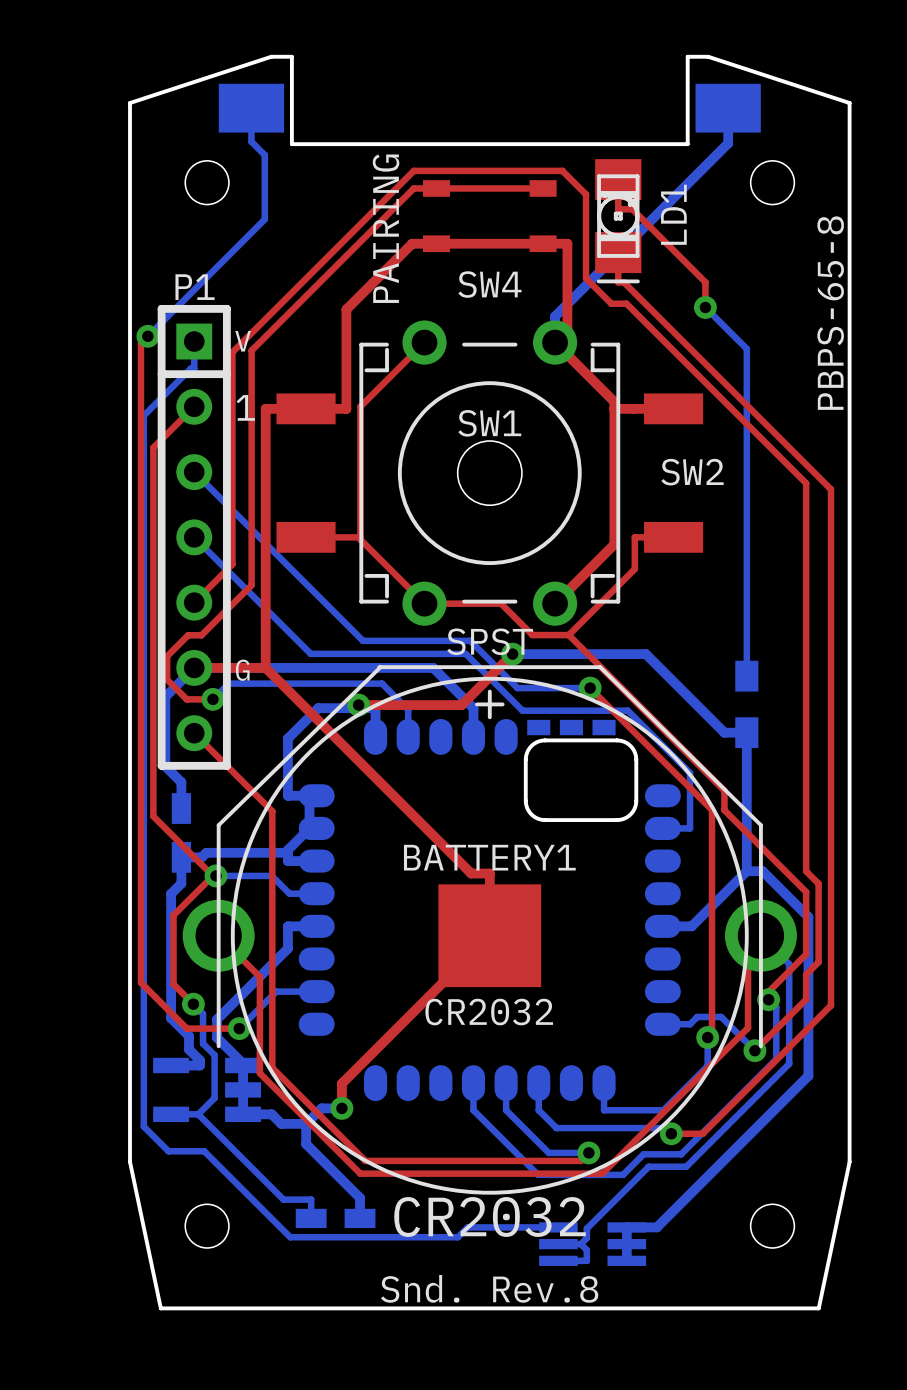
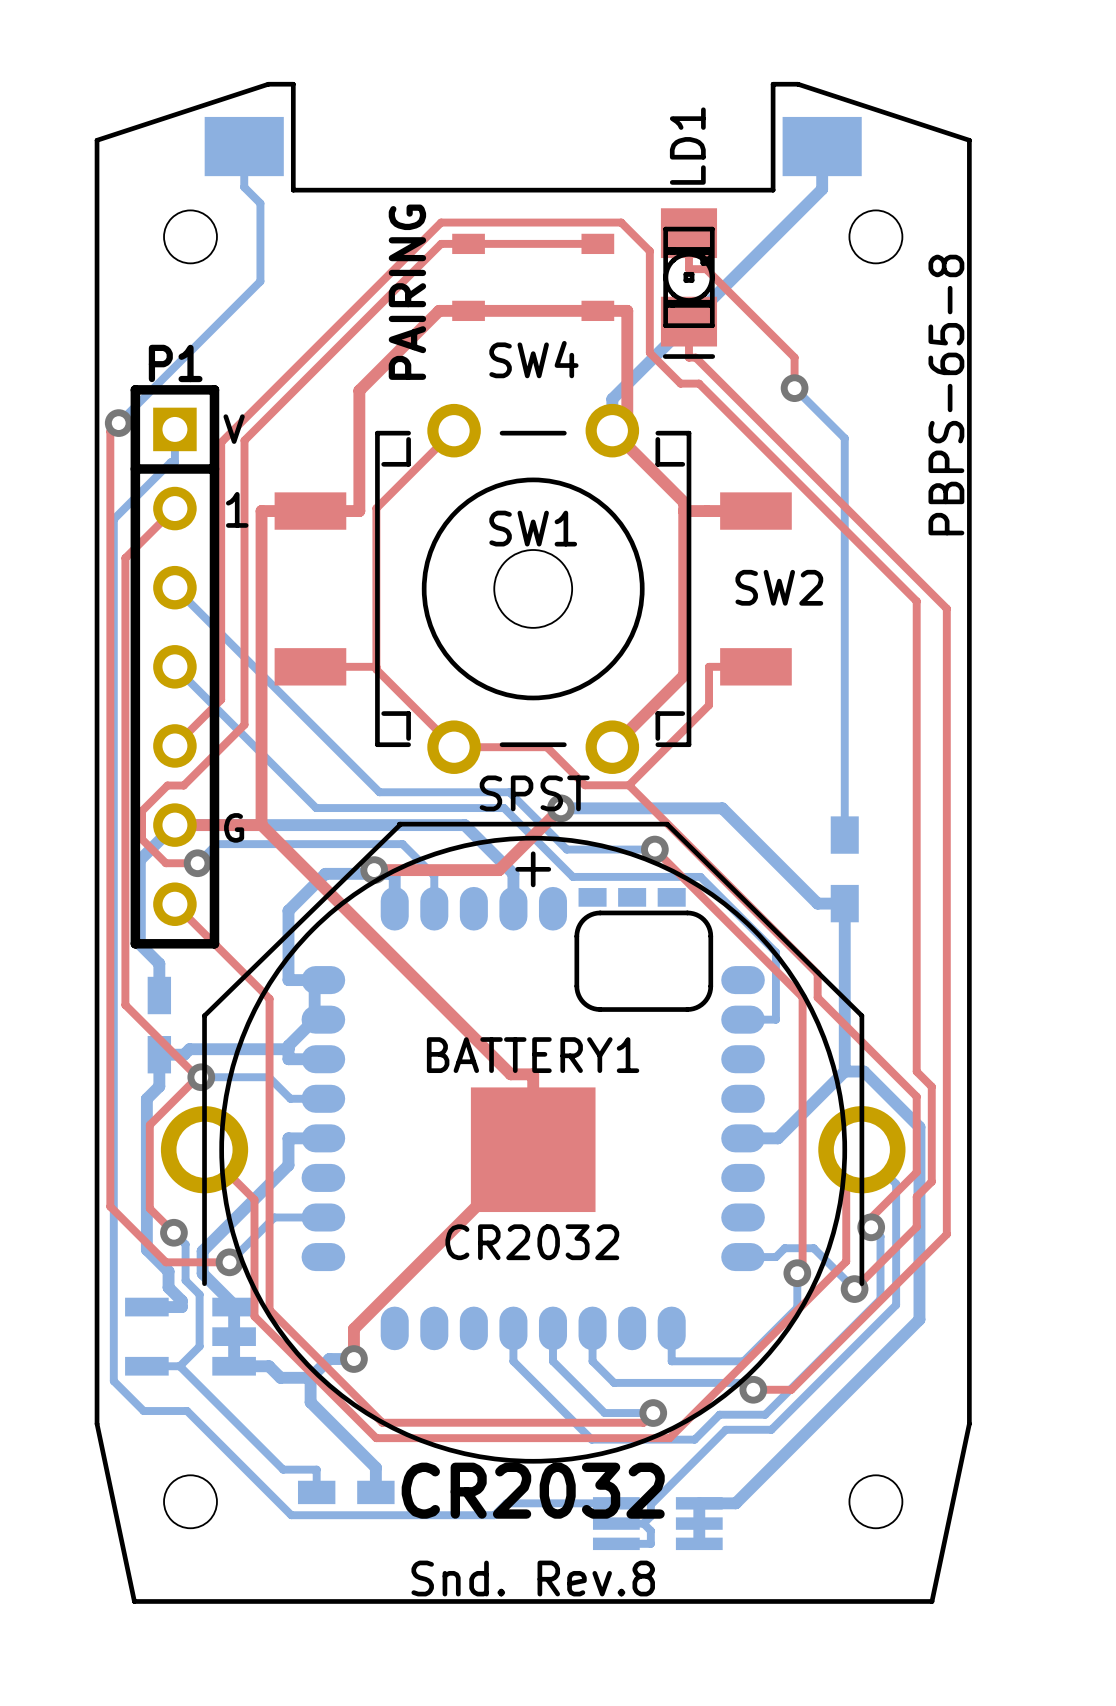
LD1 name position: LD1 (673, 214) -> LD1 (687, 146)

